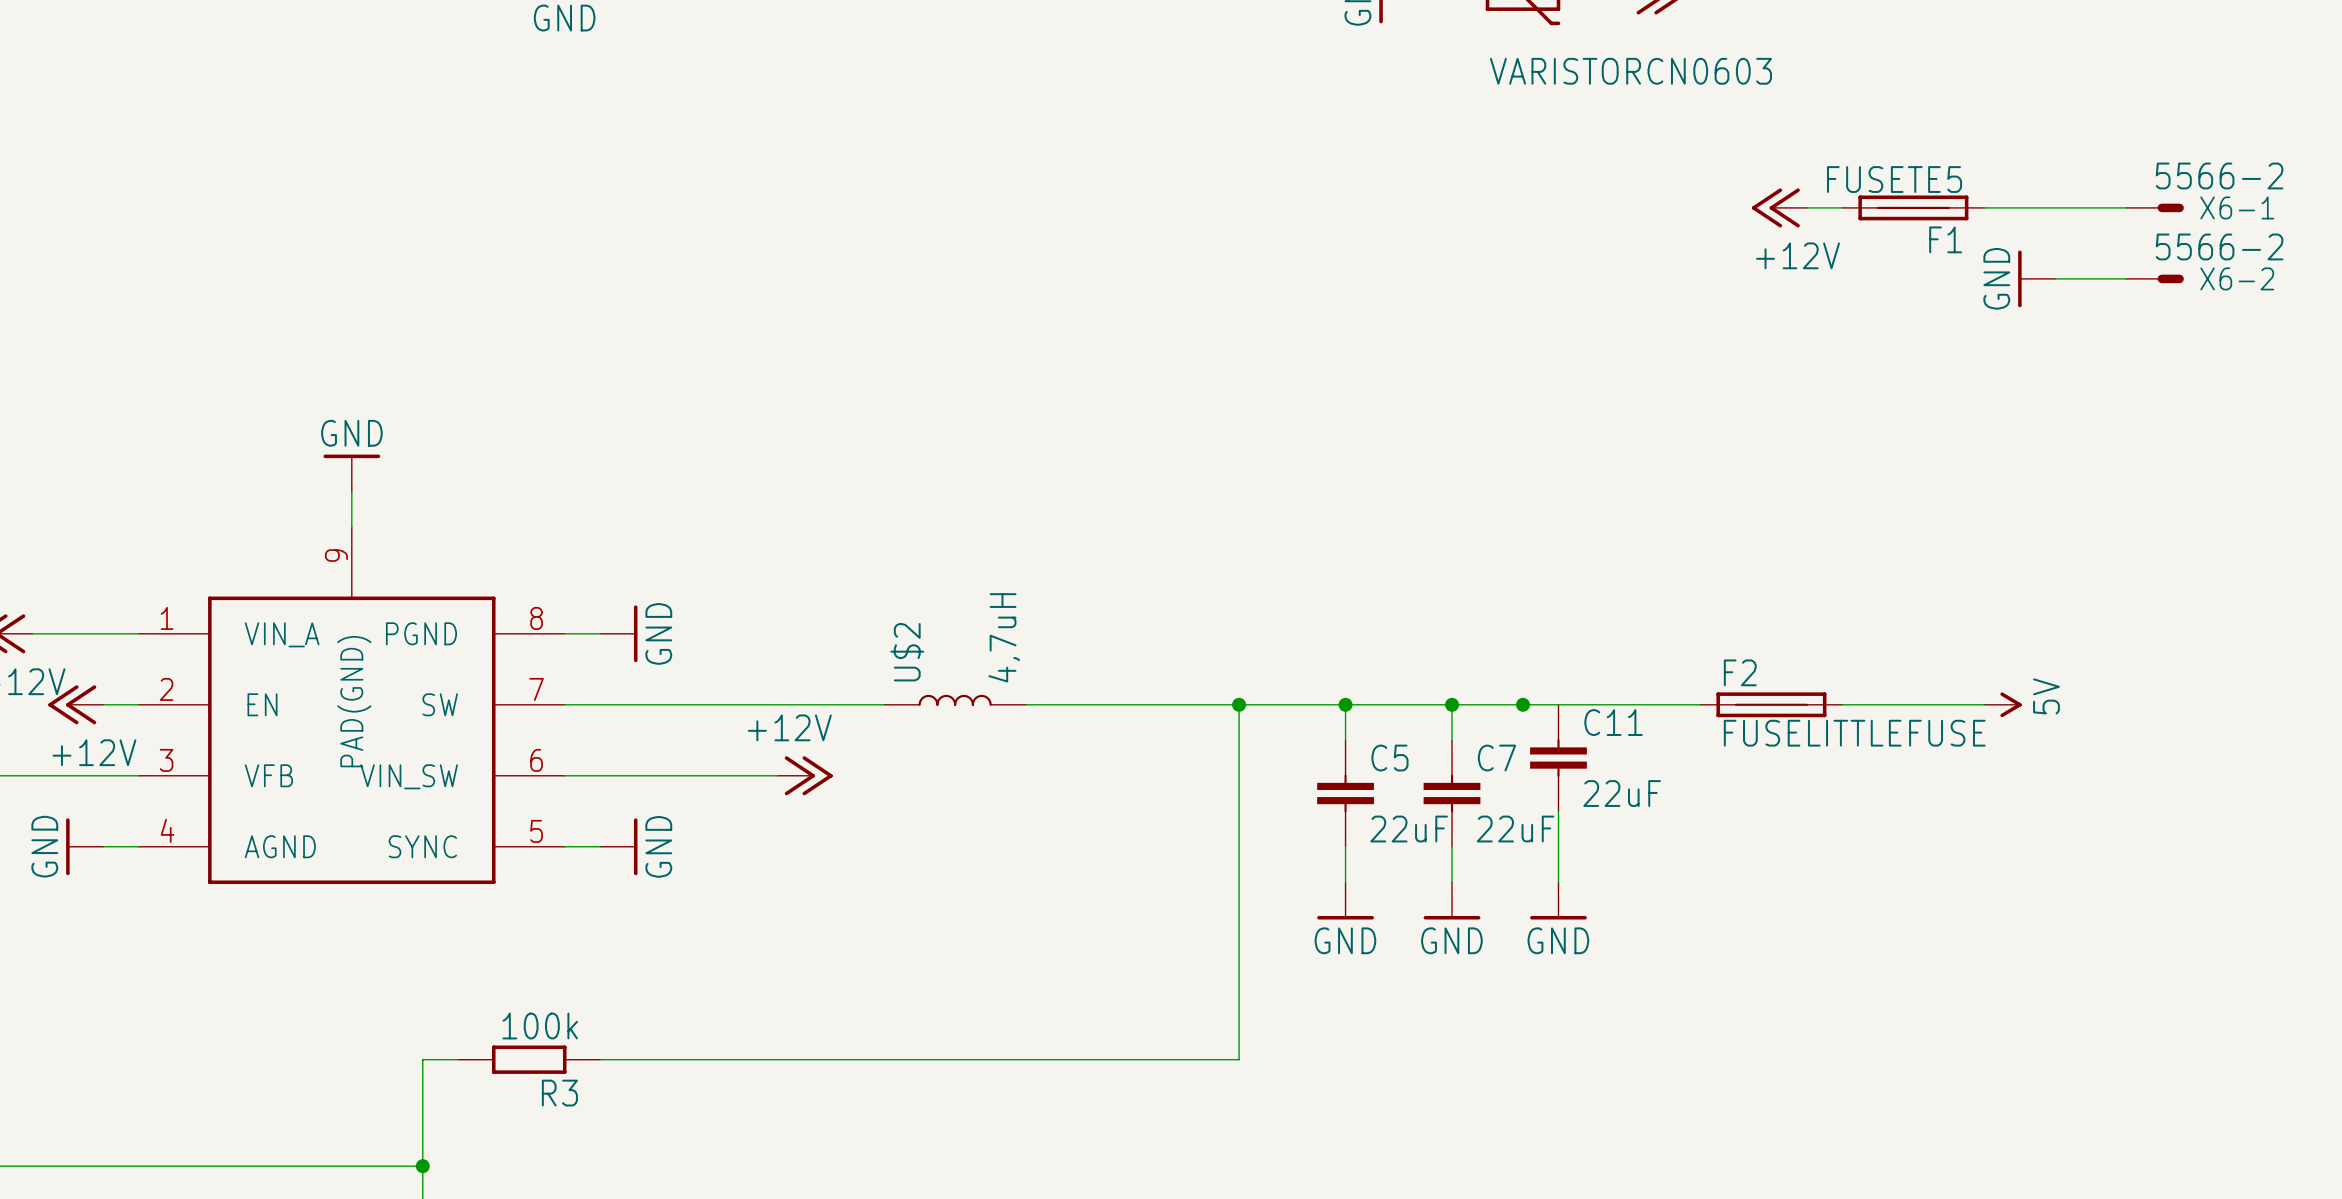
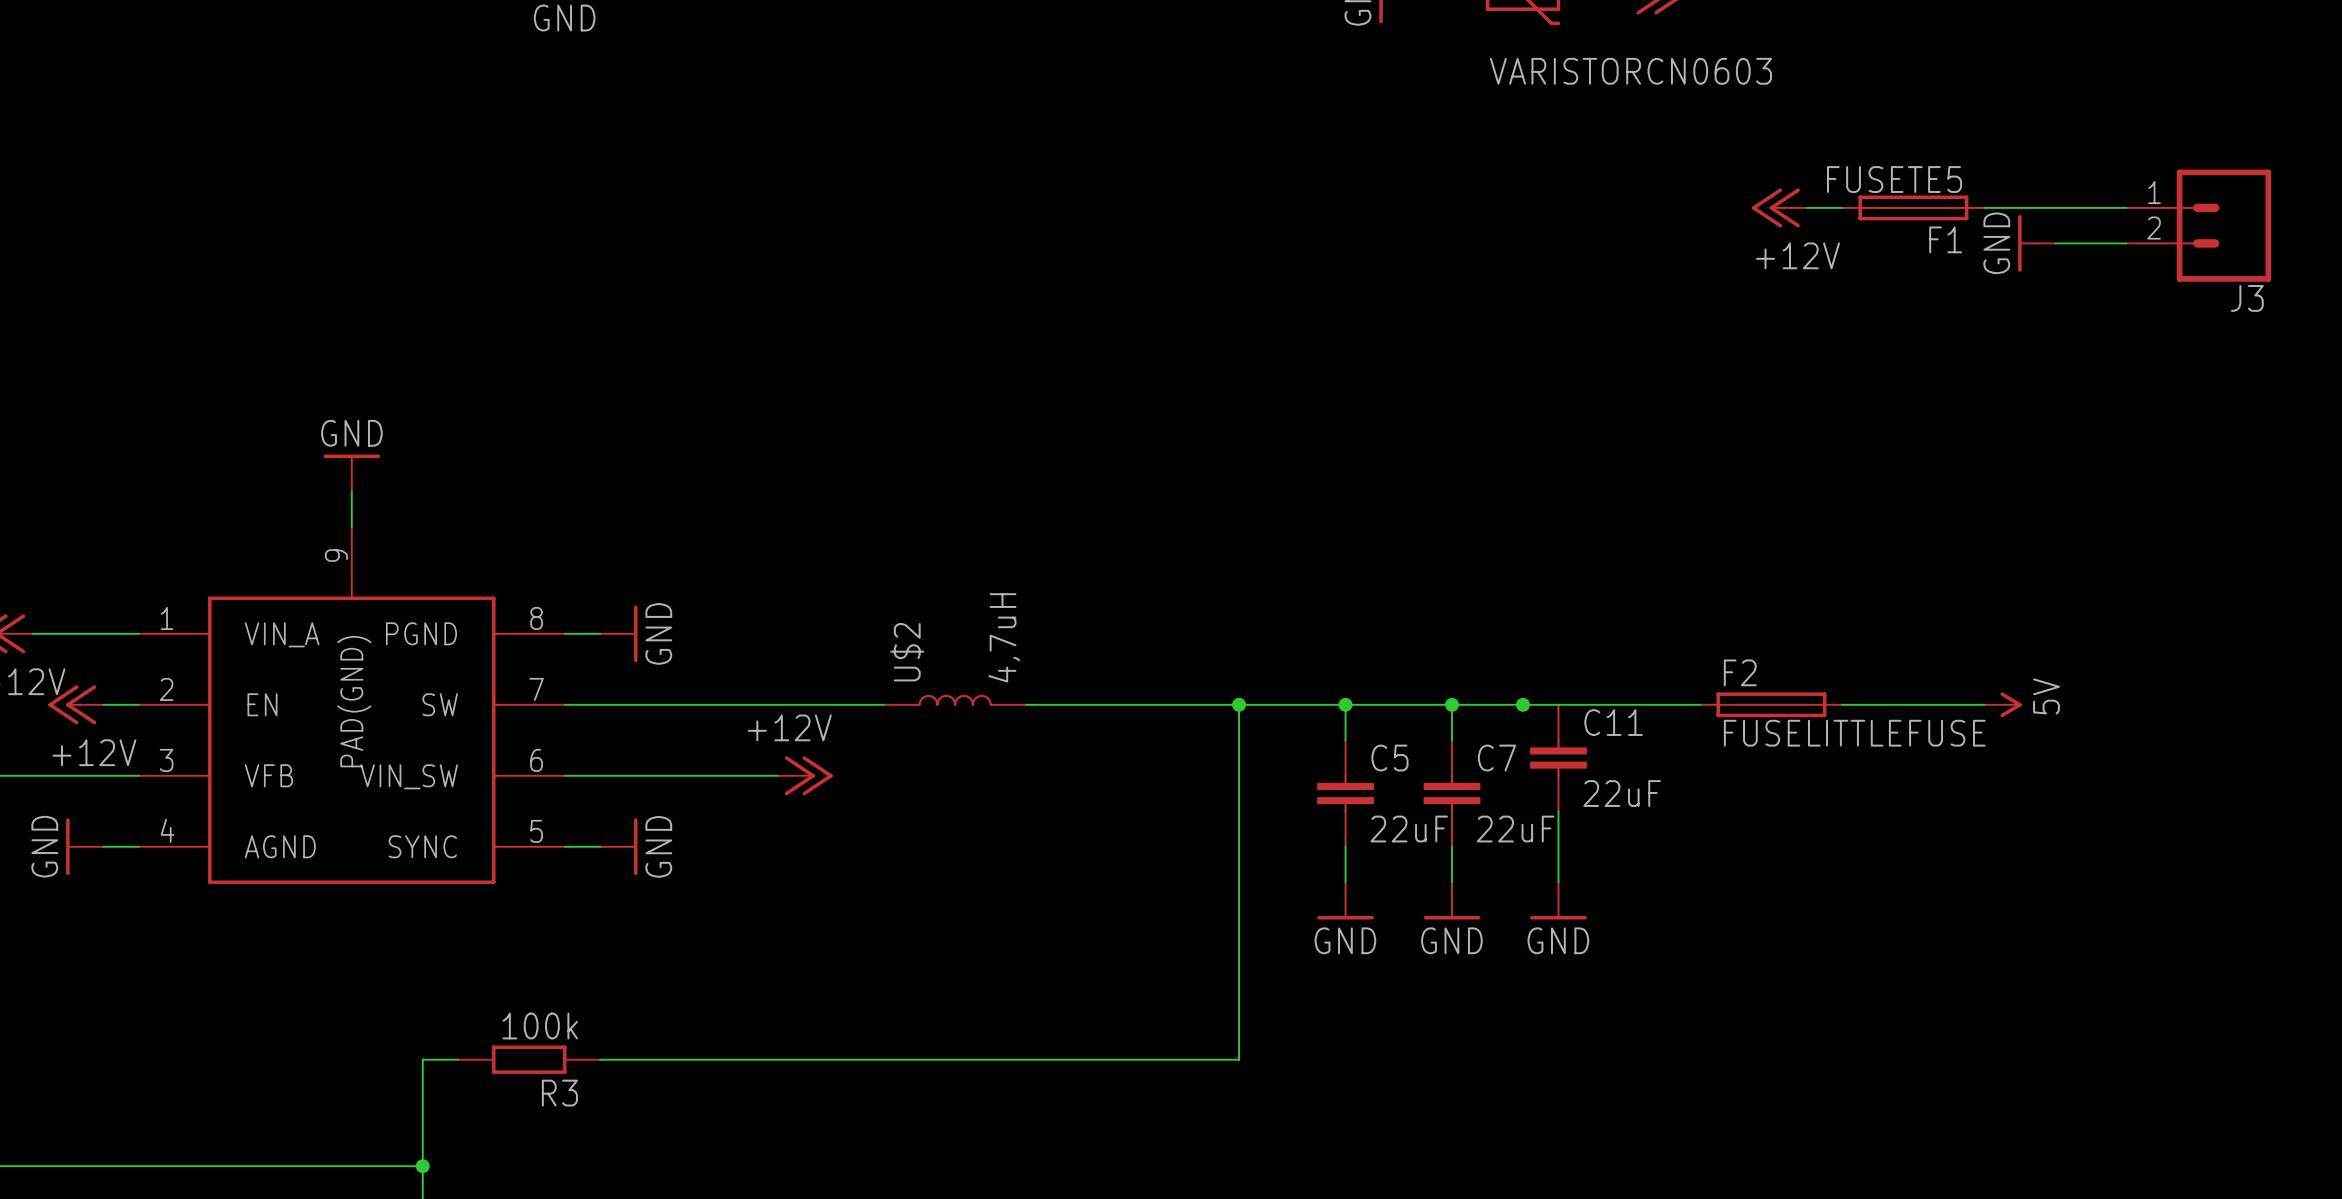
X6-1: 5566-2 (2155, 207) -> none
J3: none -> (2198, 225)
power symbol position: GND (2036, 278) -> GND (2036, 243)
wire: (2055, 278) (2126, 278) -> (2055, 243) (2126, 243)
X6-2: 5566-2 (2155, 278) -> none

